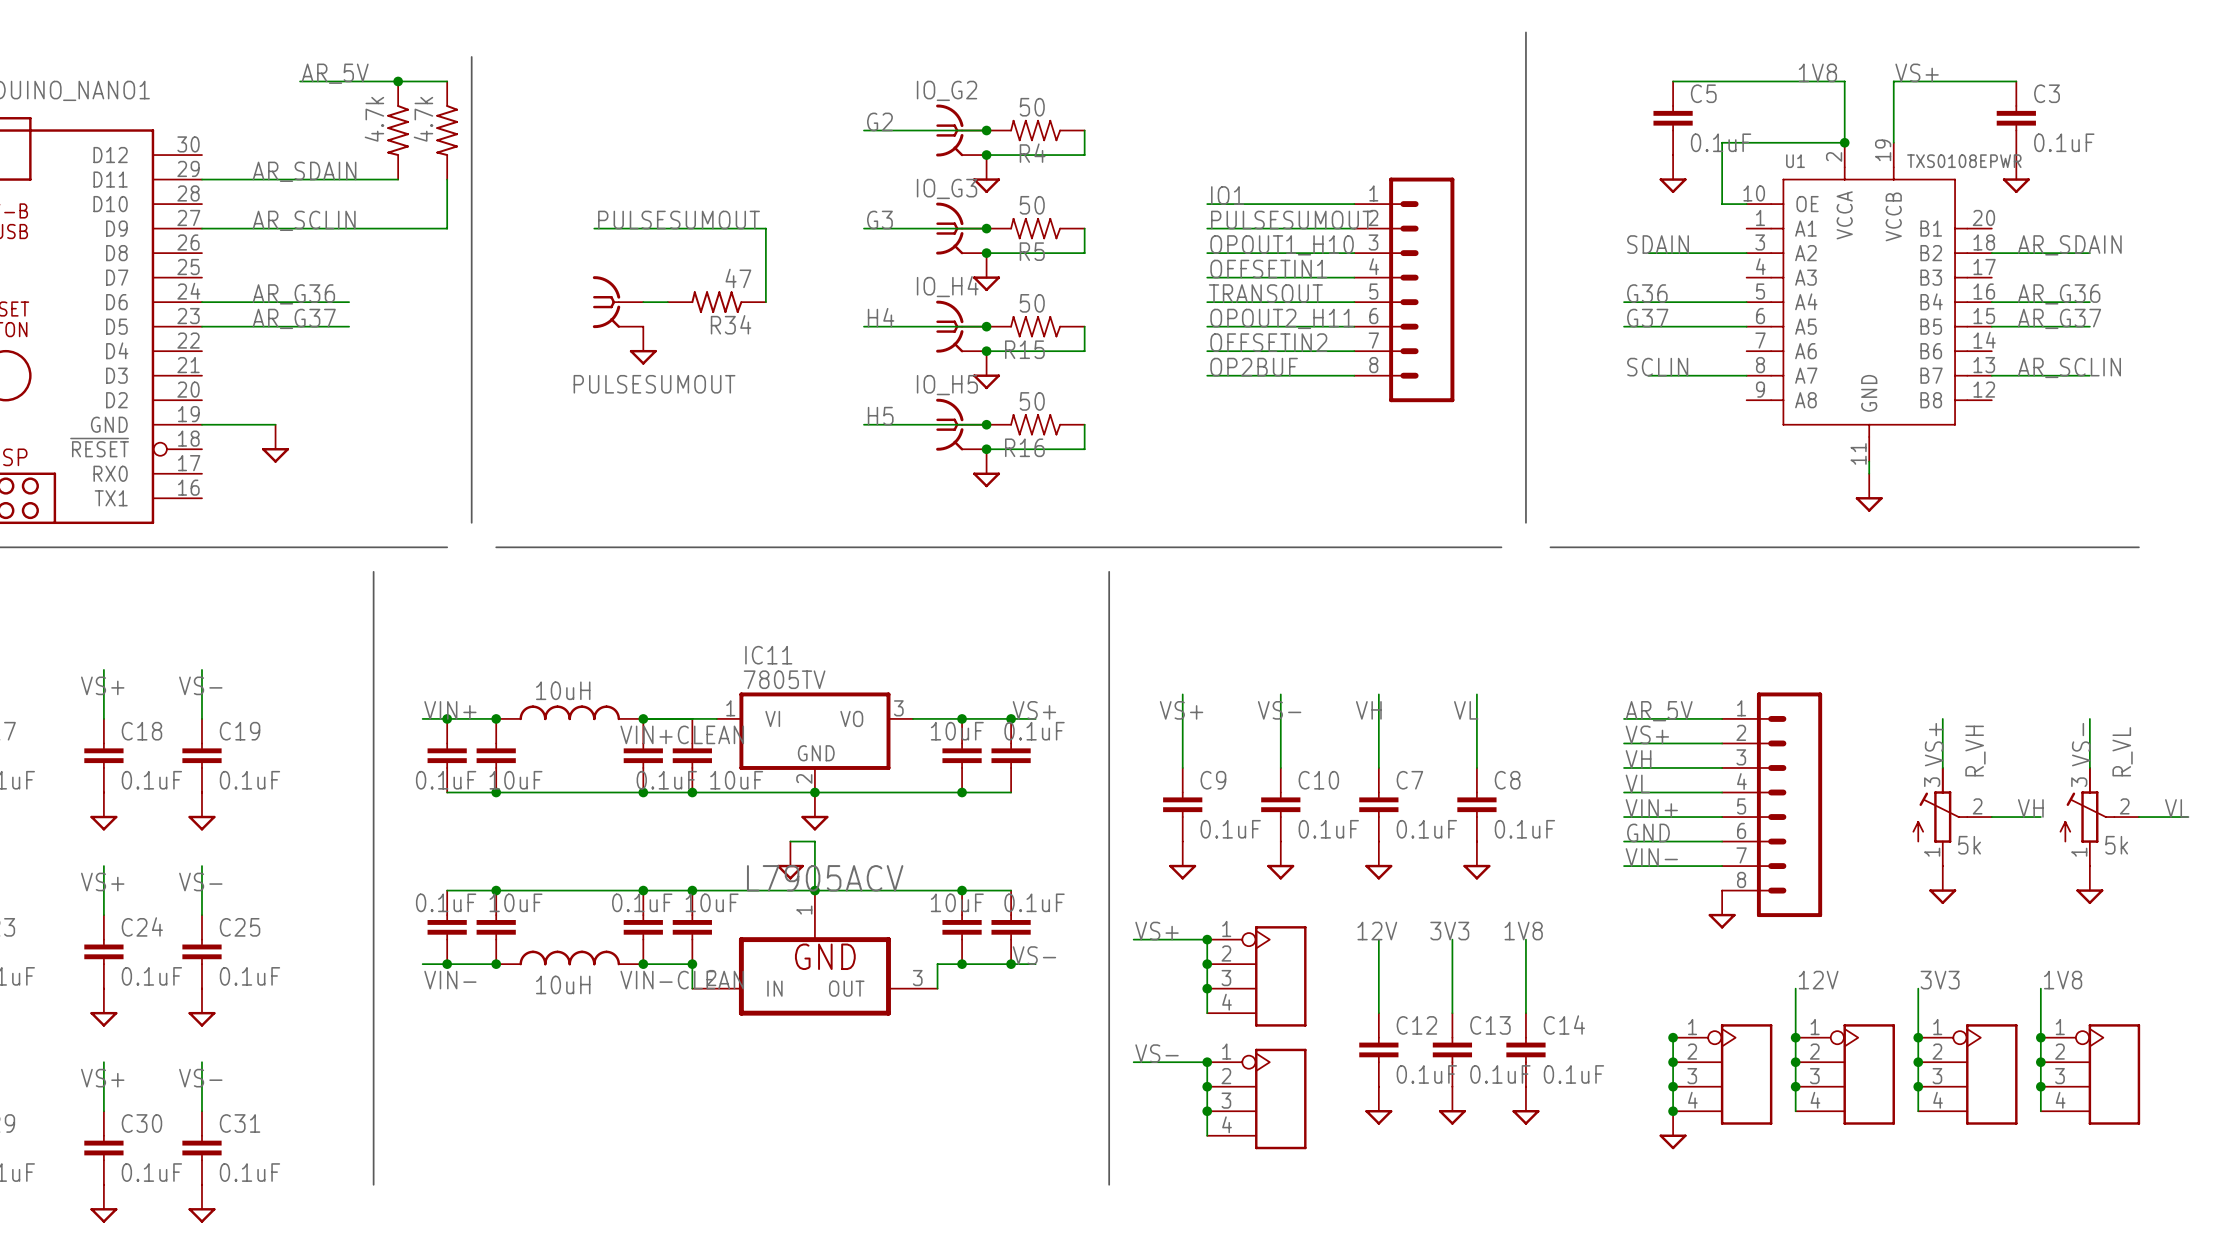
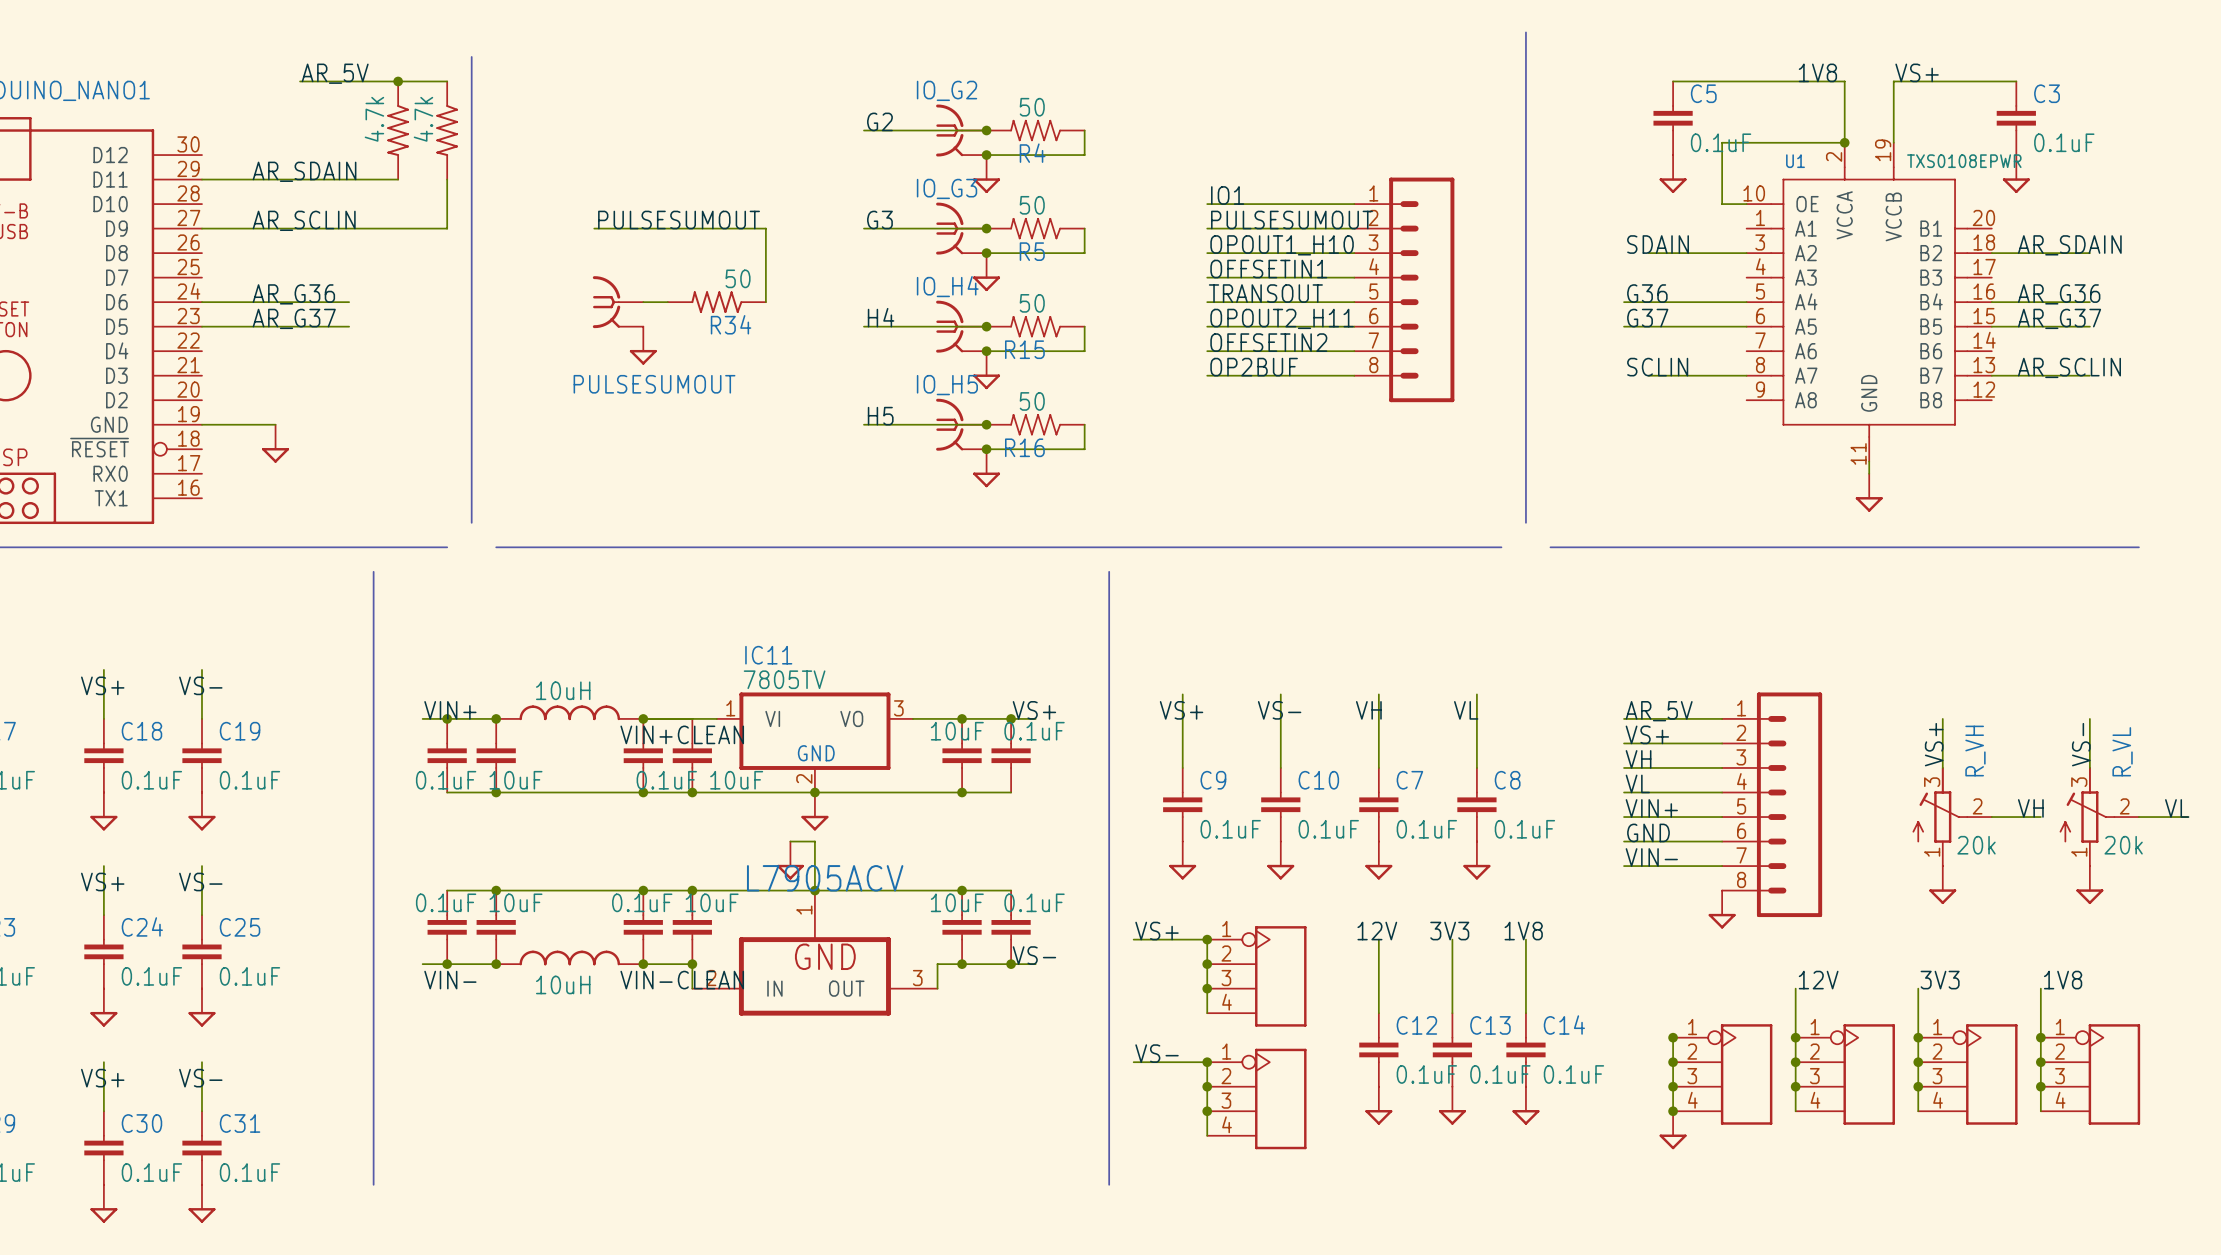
R34 value: 47 (738, 278) -> 50 (738, 278)
R_VH value: 5k (1969, 845) -> 20k (1976, 845)
R_VL value: 5k (2116, 845) -> 20k (2123, 845)

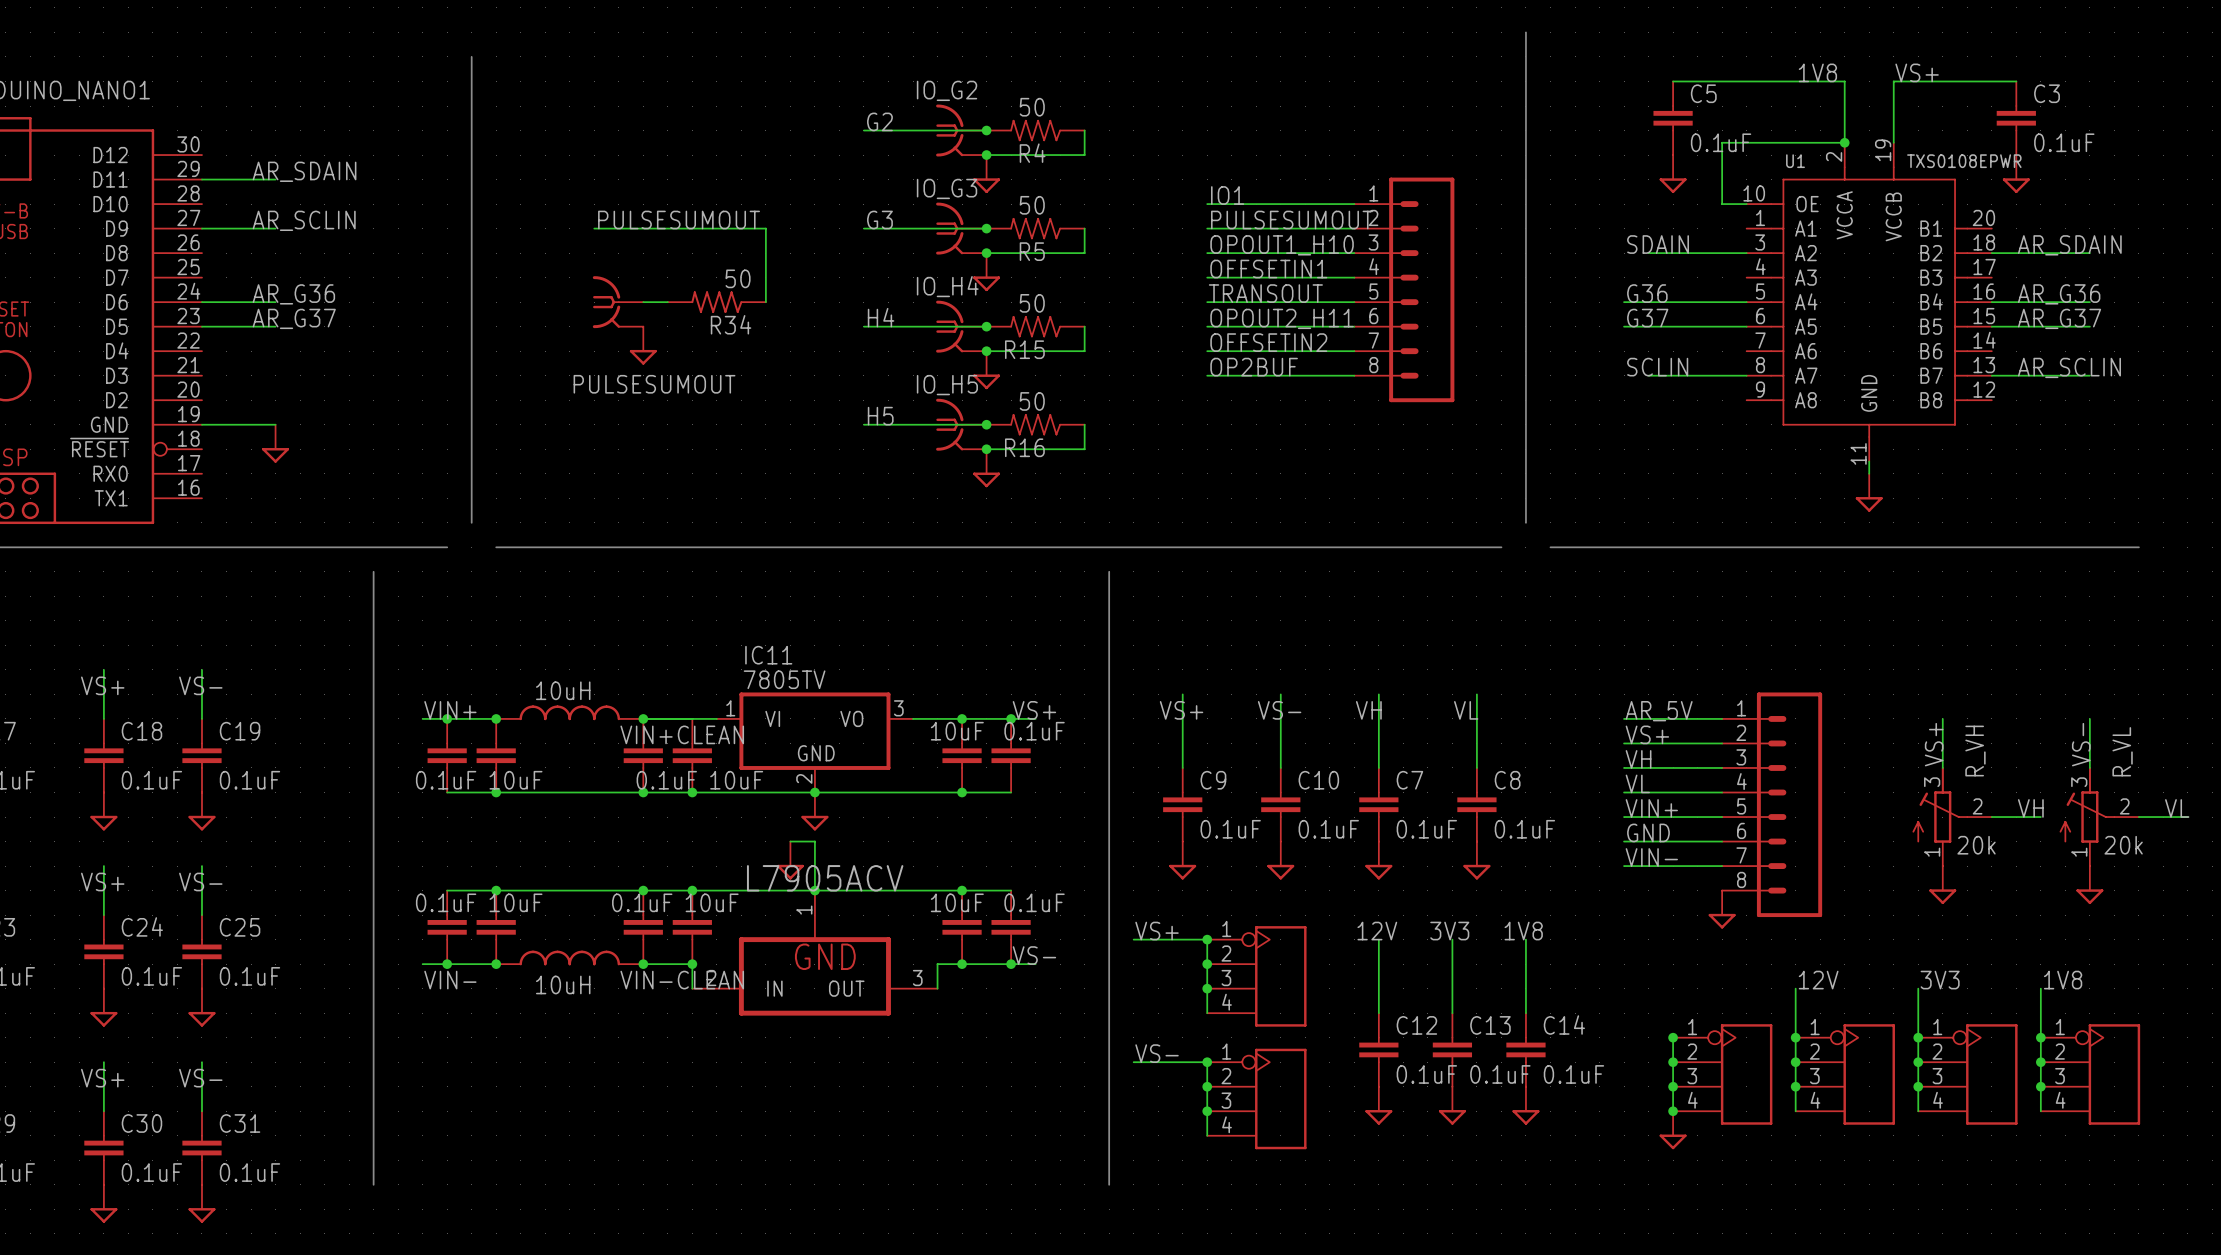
label: AR_5V (335, 73) -> none
wire: (300, 81) (447, 81) -> none
junction: (398, 81) -> none
part: 4.7k (398, 130) -> none
part: 4.7k (447, 130) -> none
wire: (275, 179) (398, 179) -> none
wire: (447, 179) (447, 228) (275, 228) -> none
wire: (275, 302) (349, 302) -> none
wire: (275, 326) (349, 326) -> none

